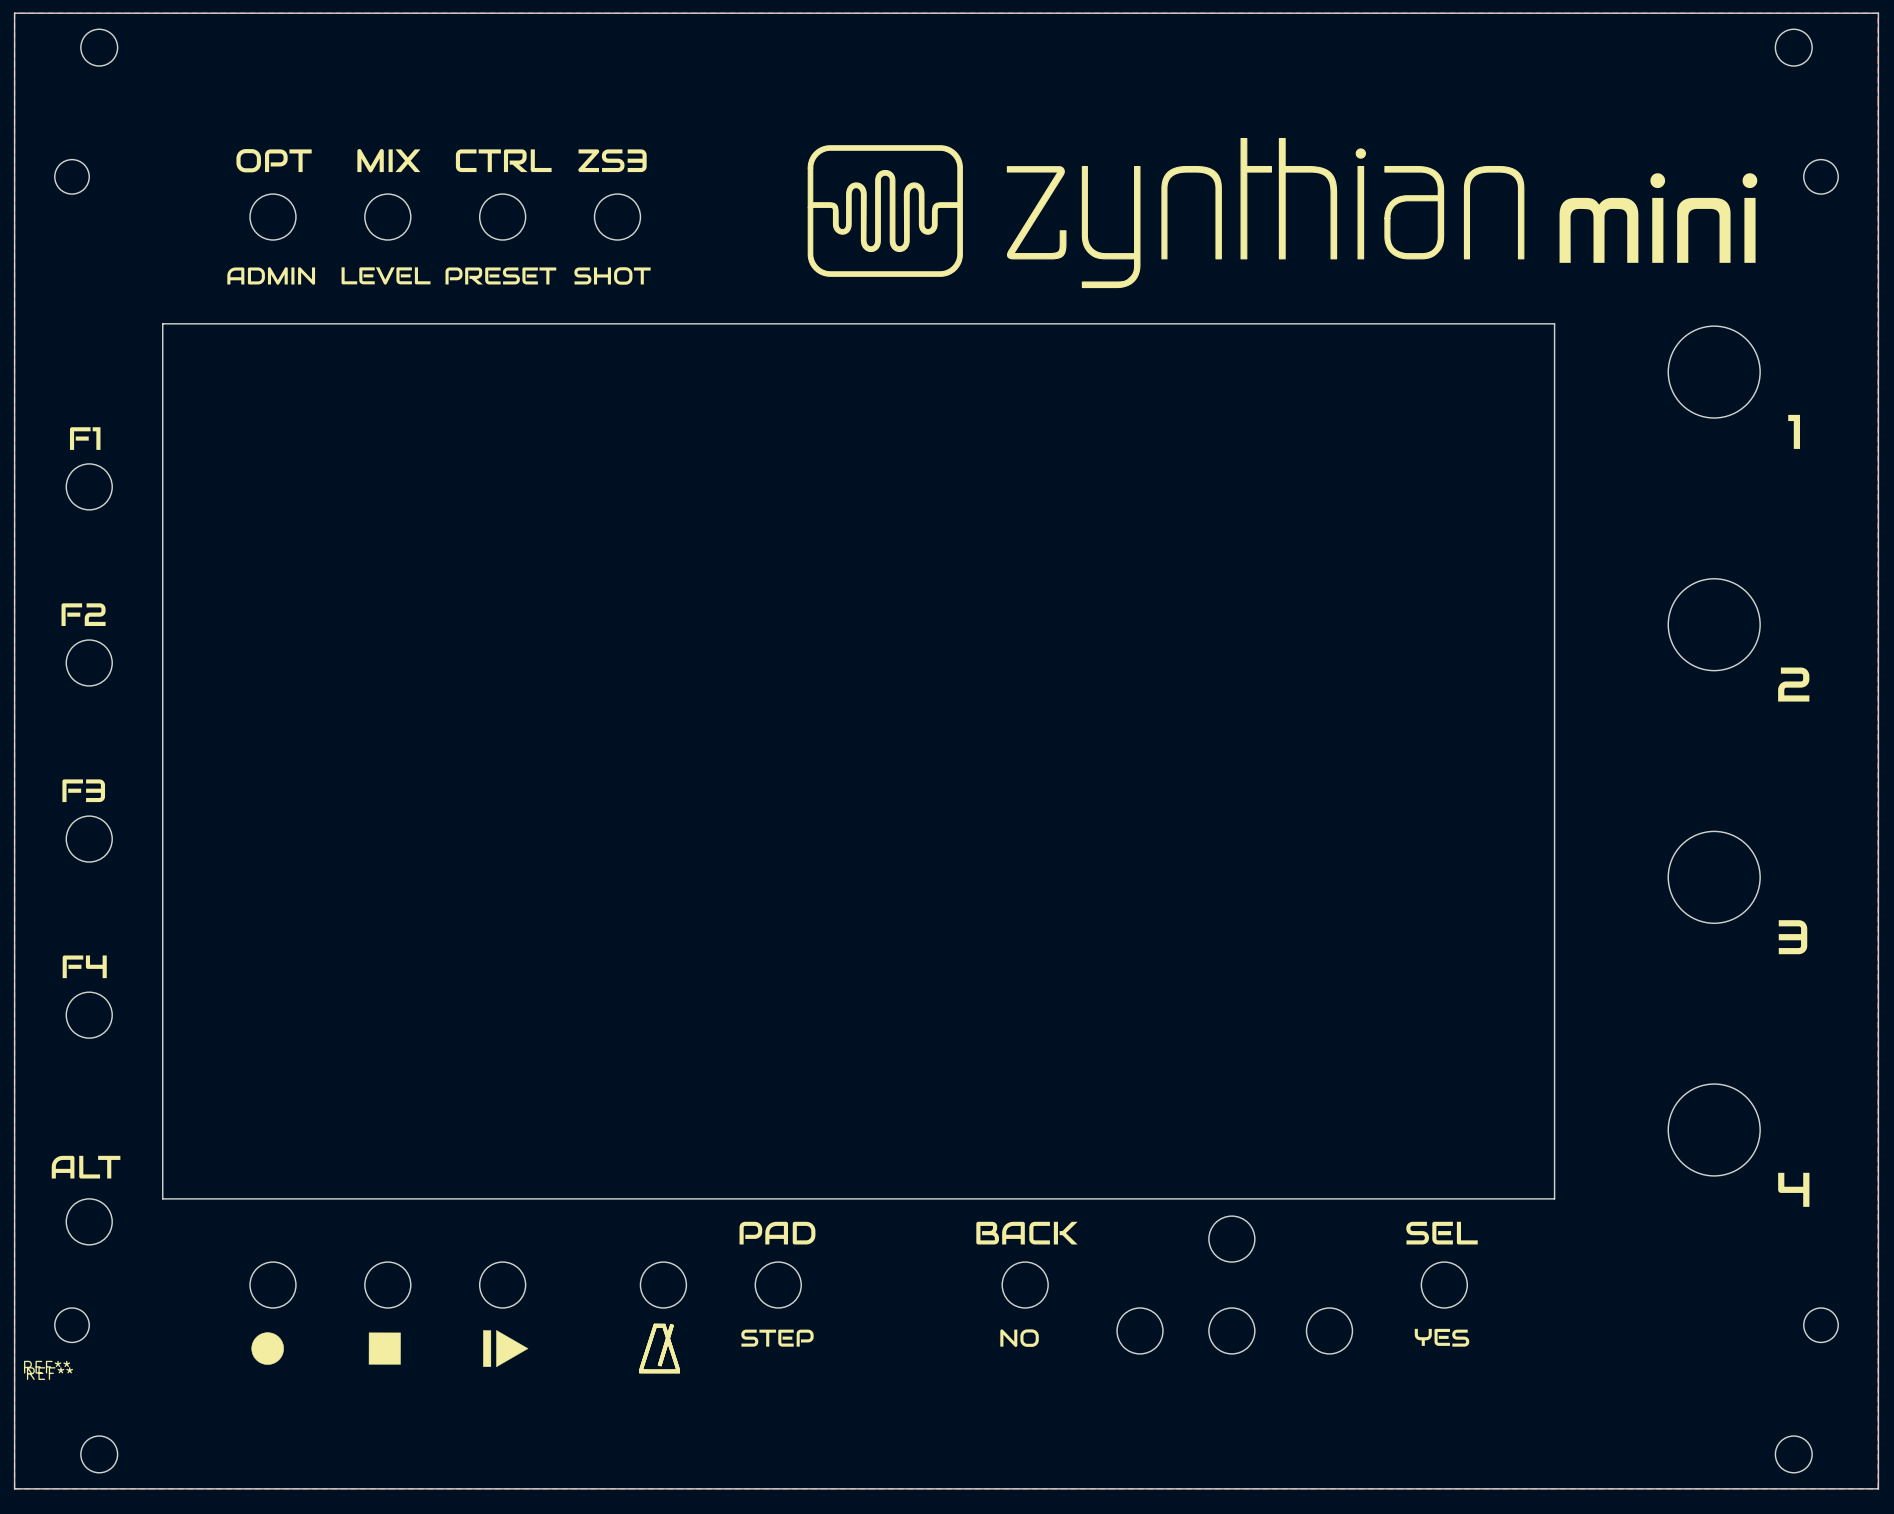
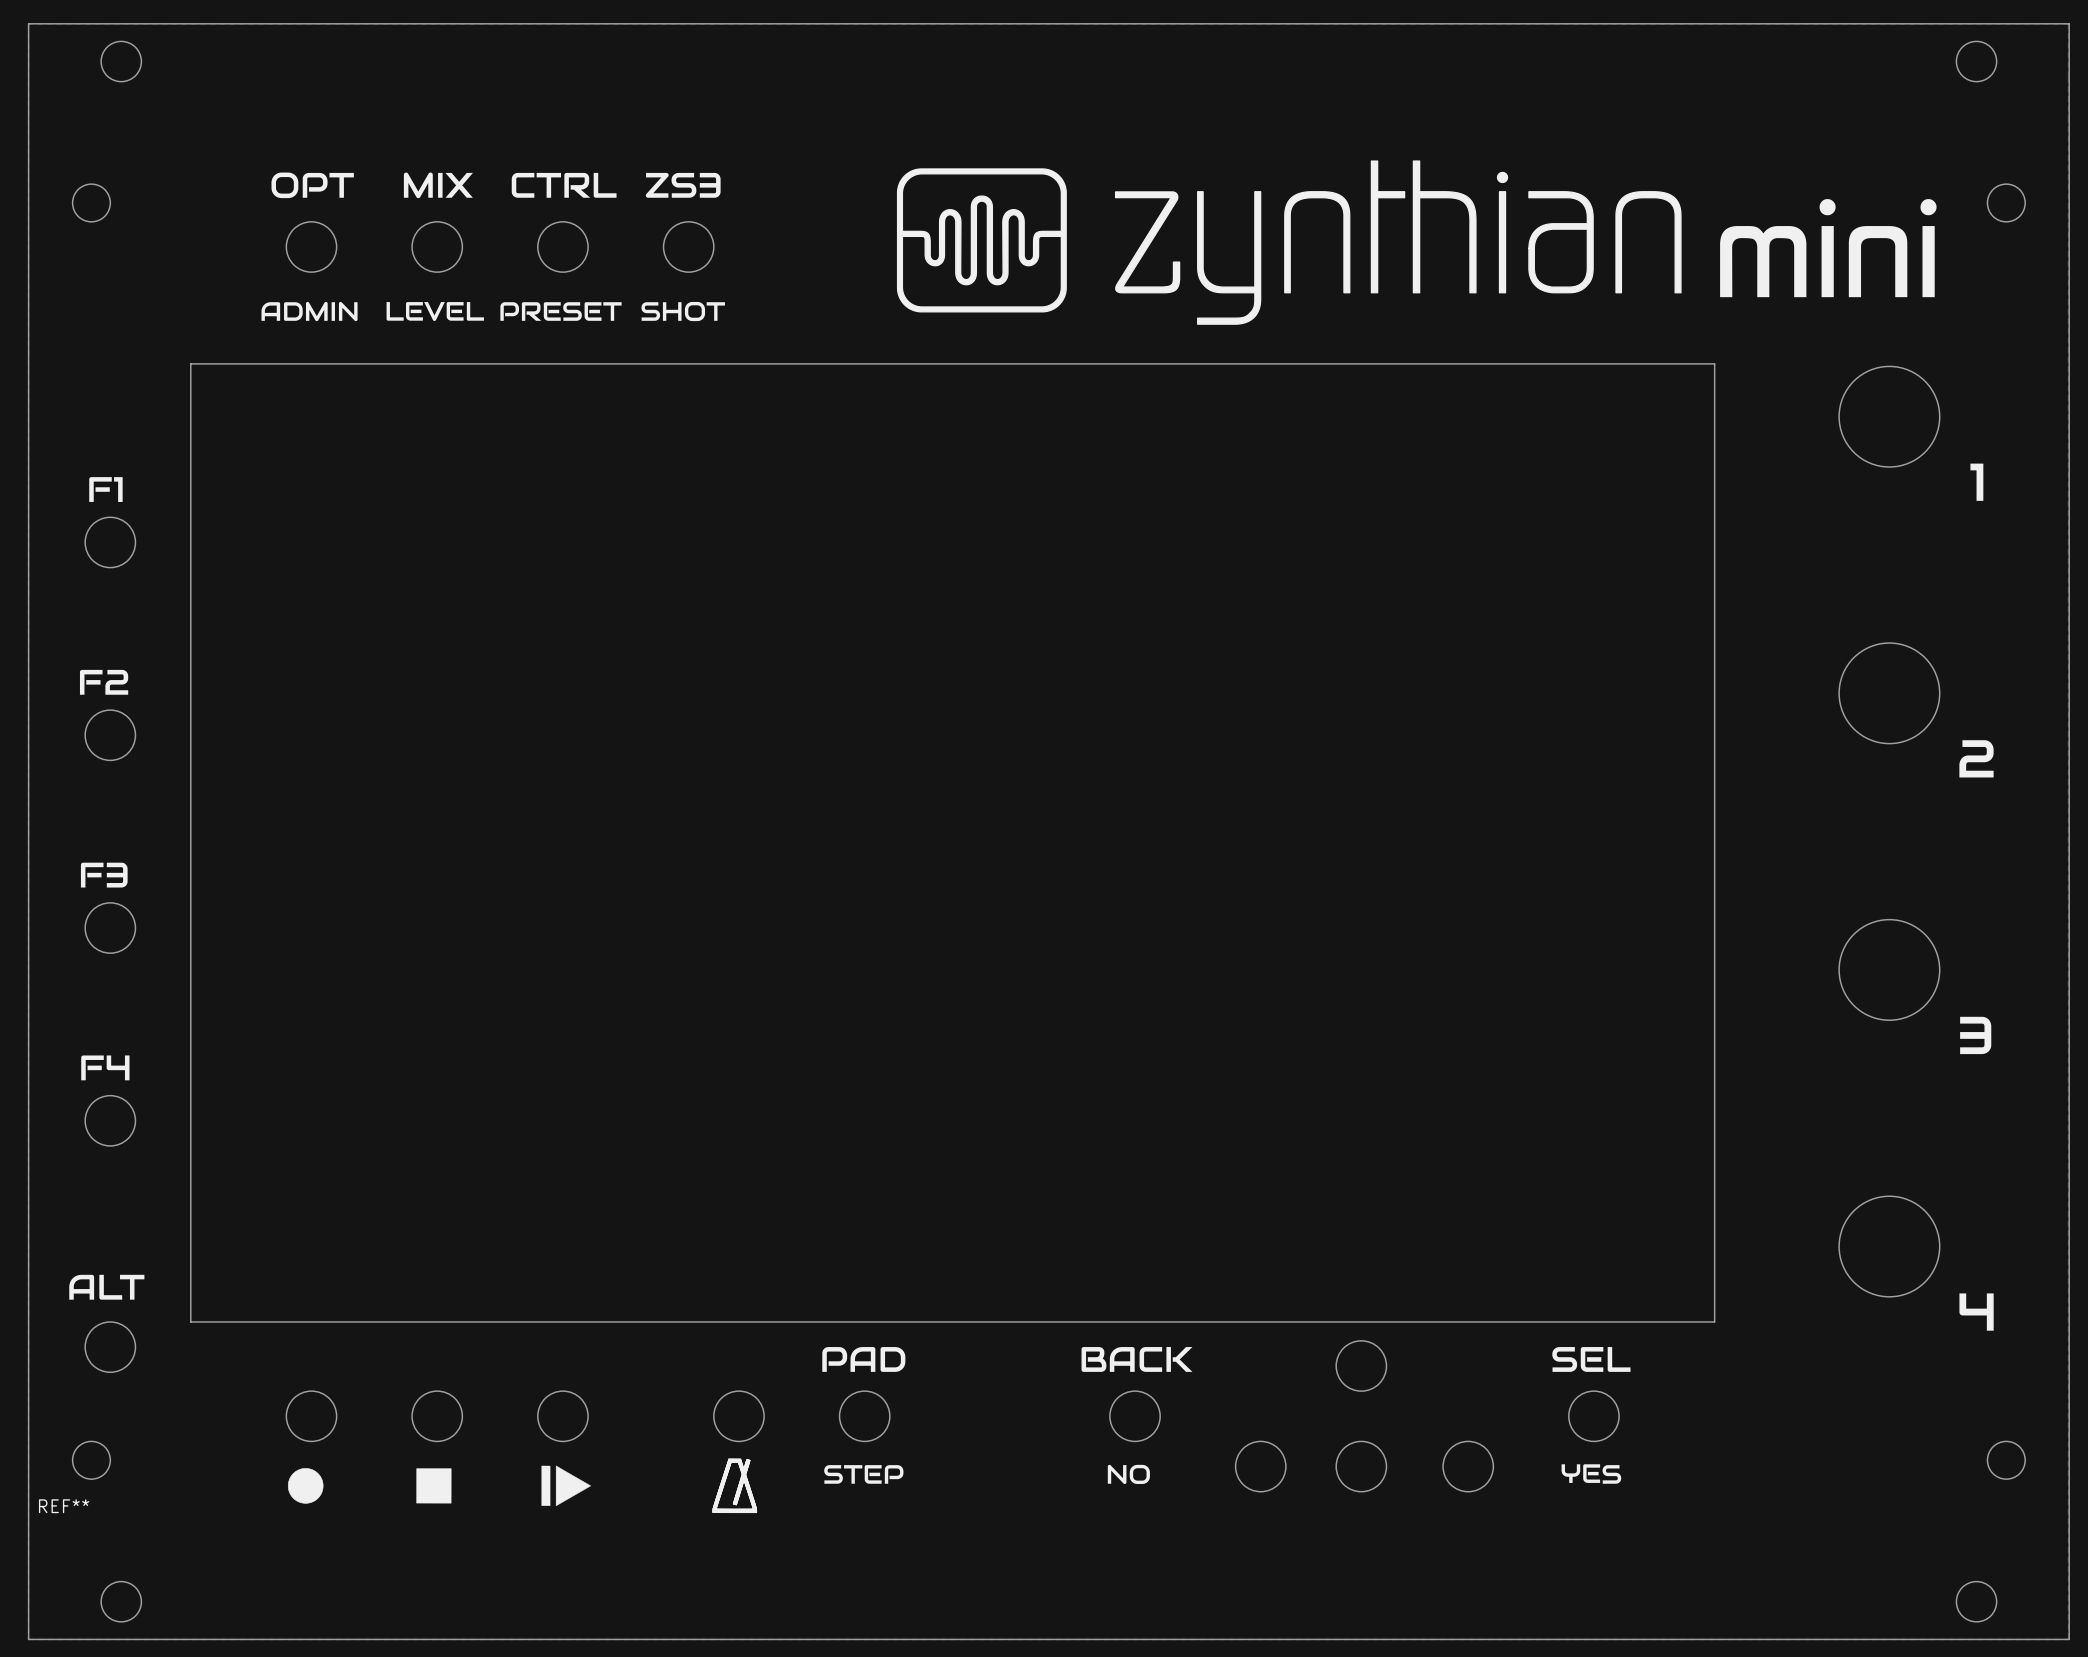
REF**: (930, 755) -> none

